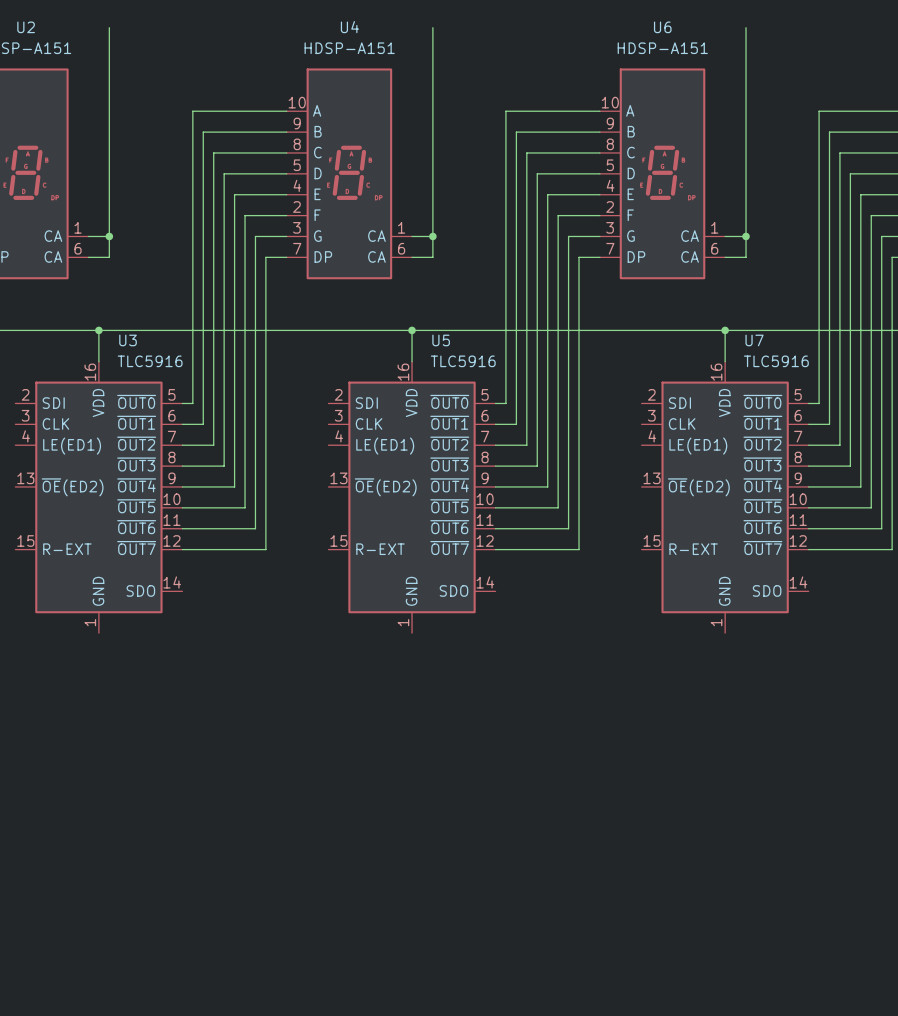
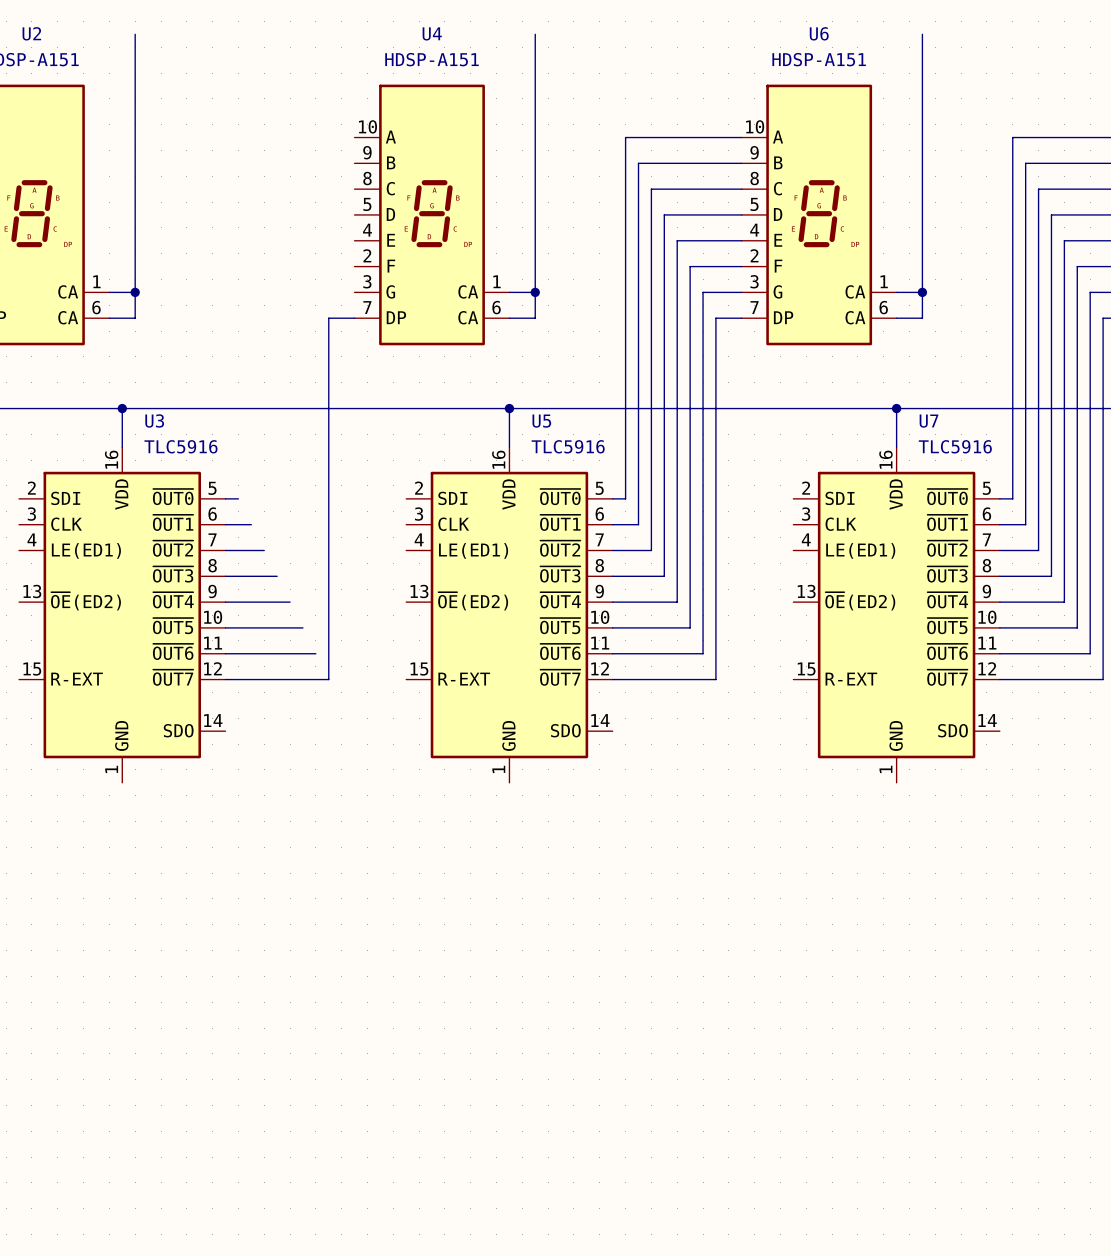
wire: (286, 111) (192, 111) (192, 403) -> none
wire: (286, 132) (203, 132) (203, 424) -> none
wire: (286, 152) (213, 152) (213, 445) -> none
wire: (286, 173) (224, 173) (224, 466) -> none
wire: (286, 194) (234, 194) (234, 486) -> none
wire: (286, 215) (245, 215) (245, 507) -> none
wire: (286, 236) (255, 236) (255, 528) -> none

